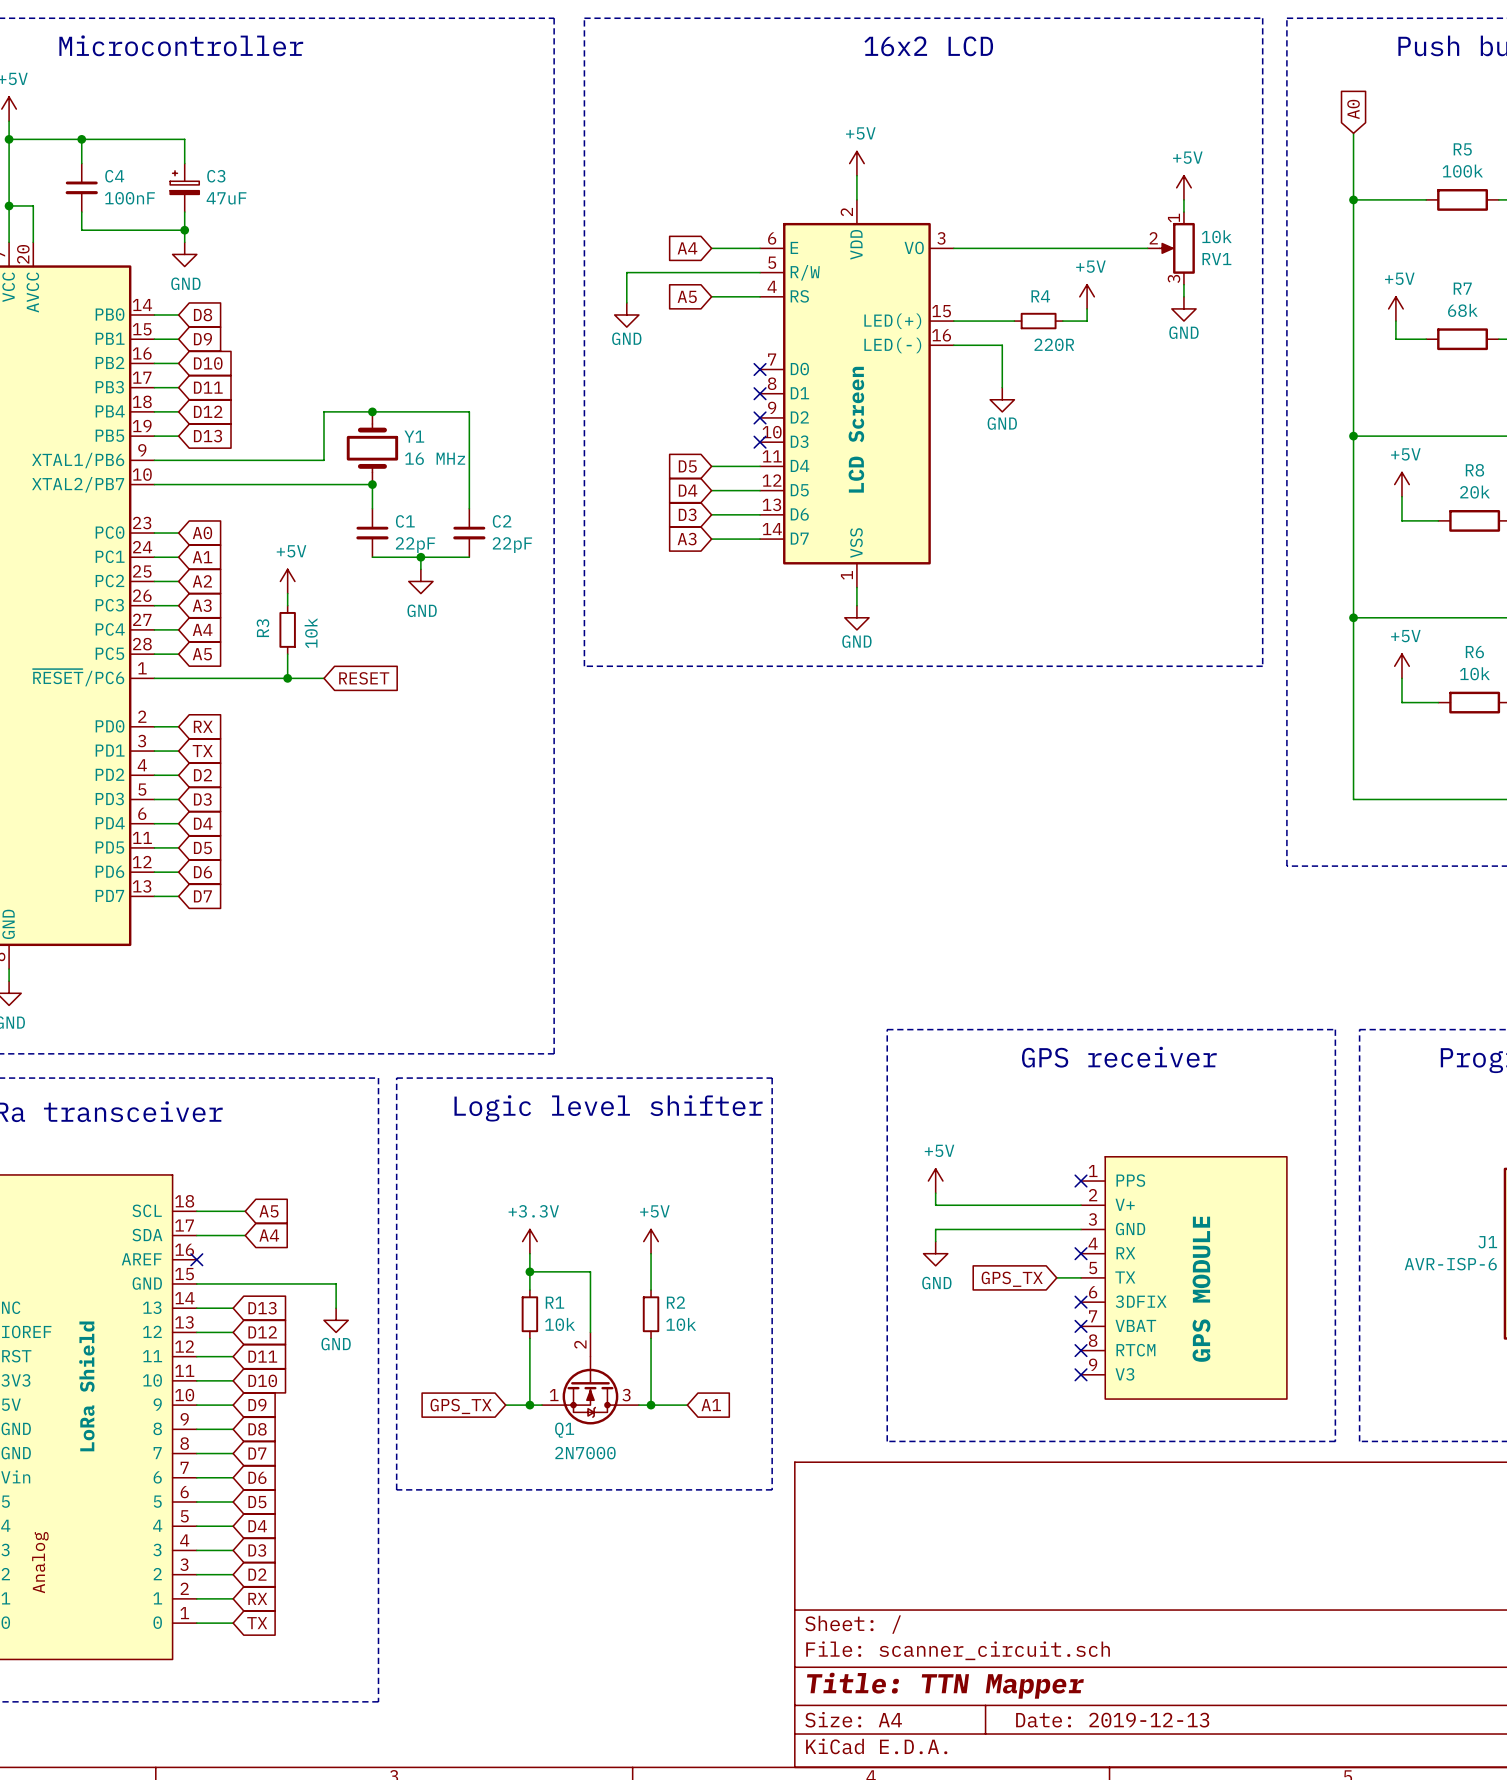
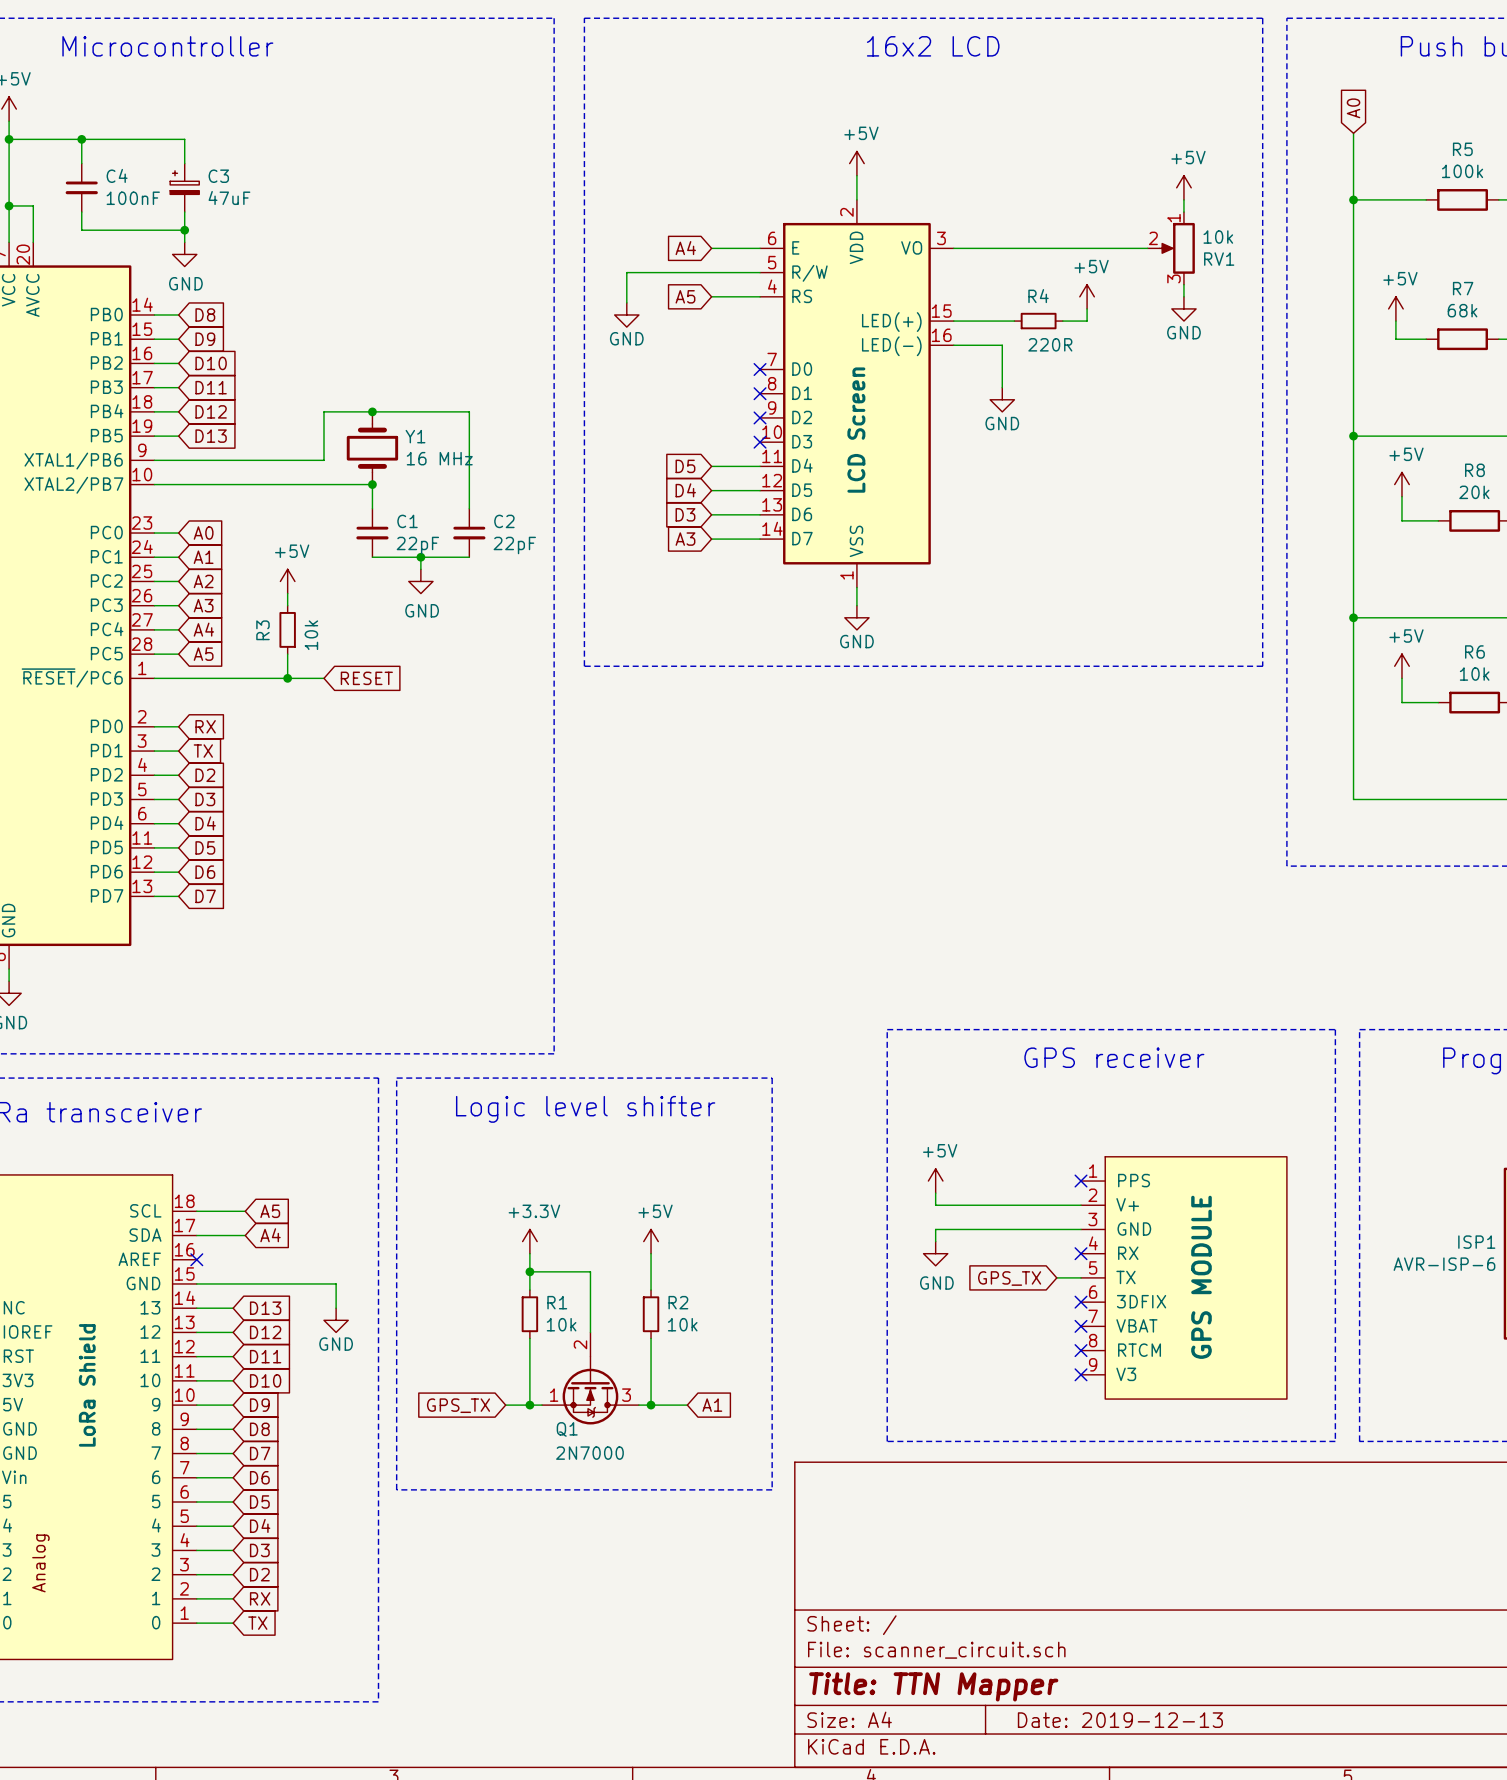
J1 name: J1 (1487, 1242) -> ISP1 (1476, 1242)

